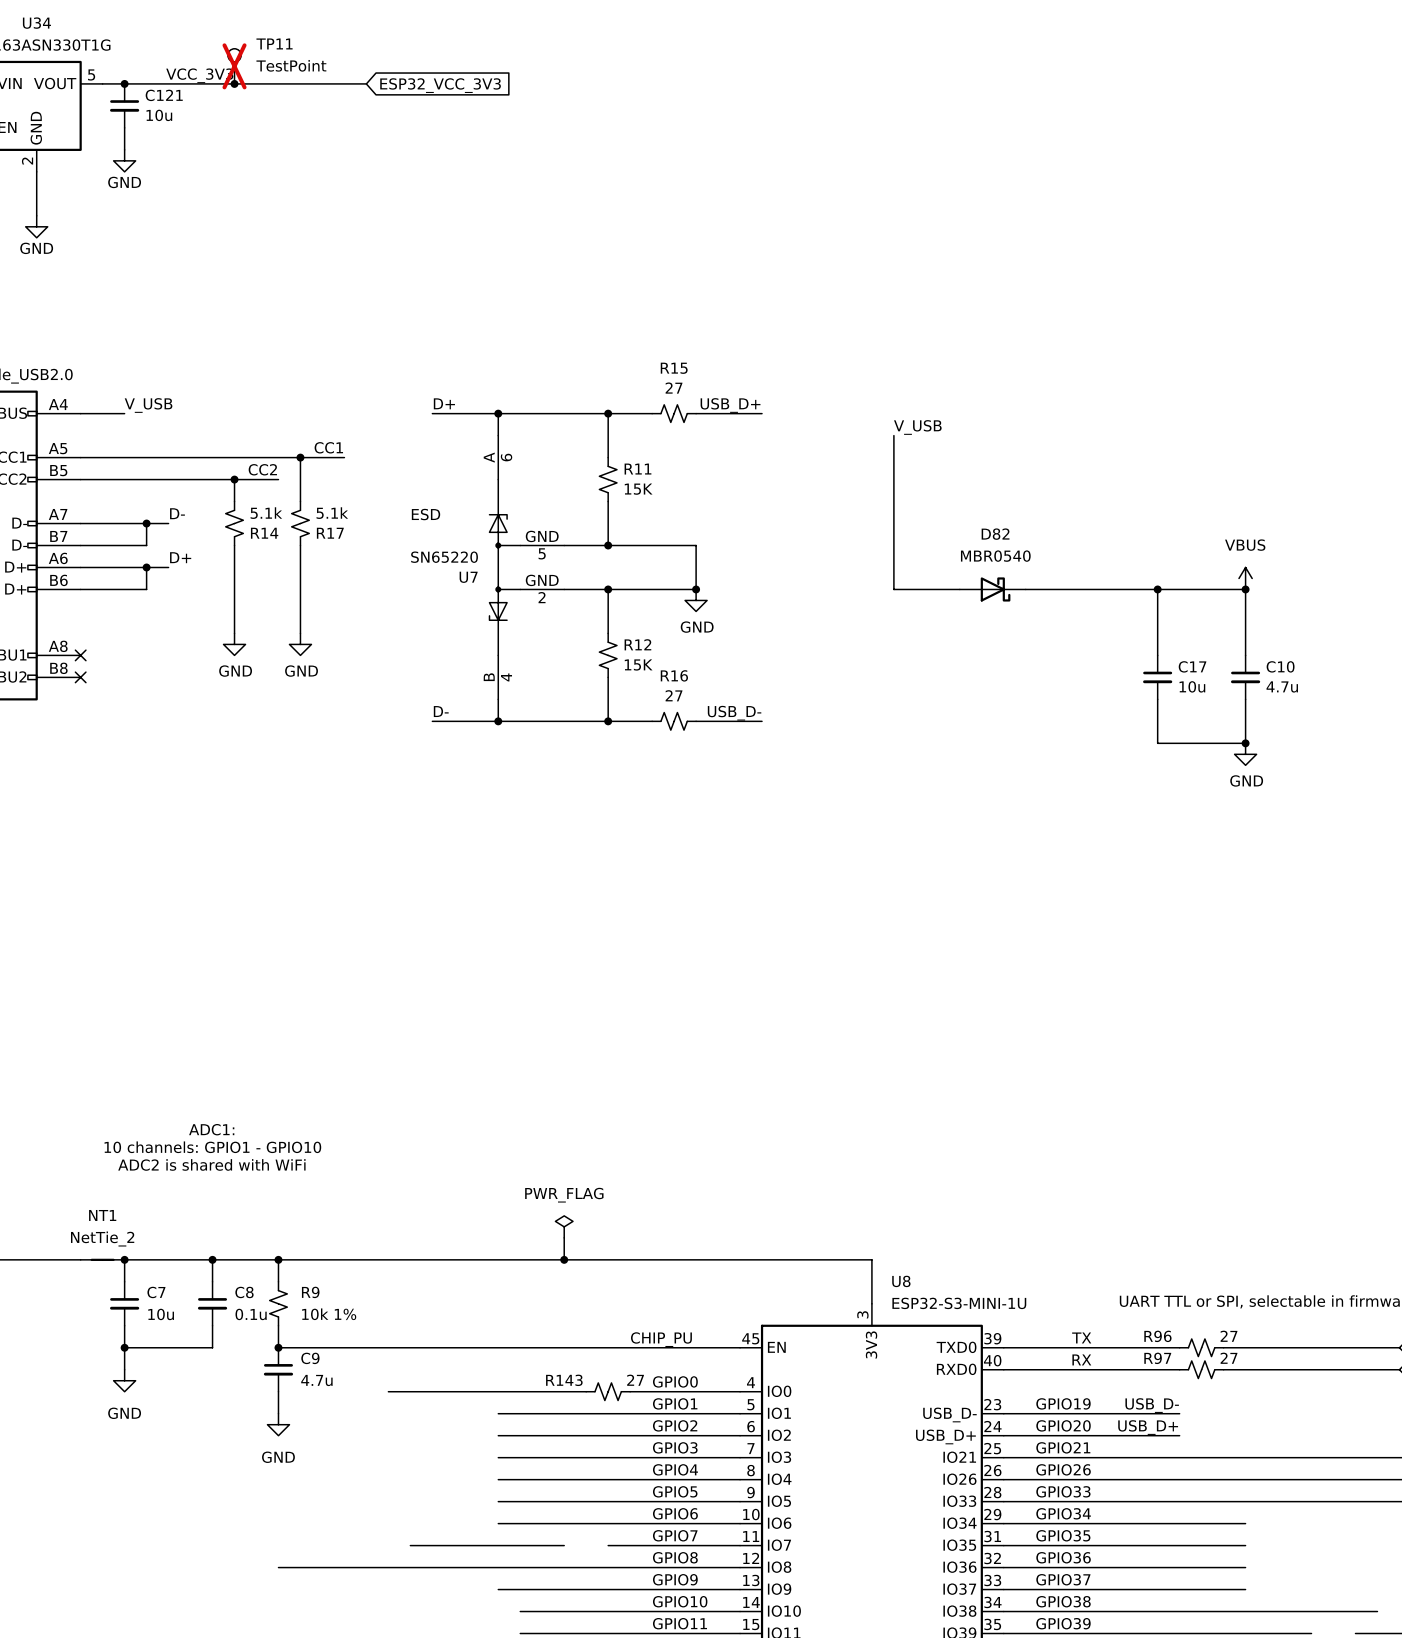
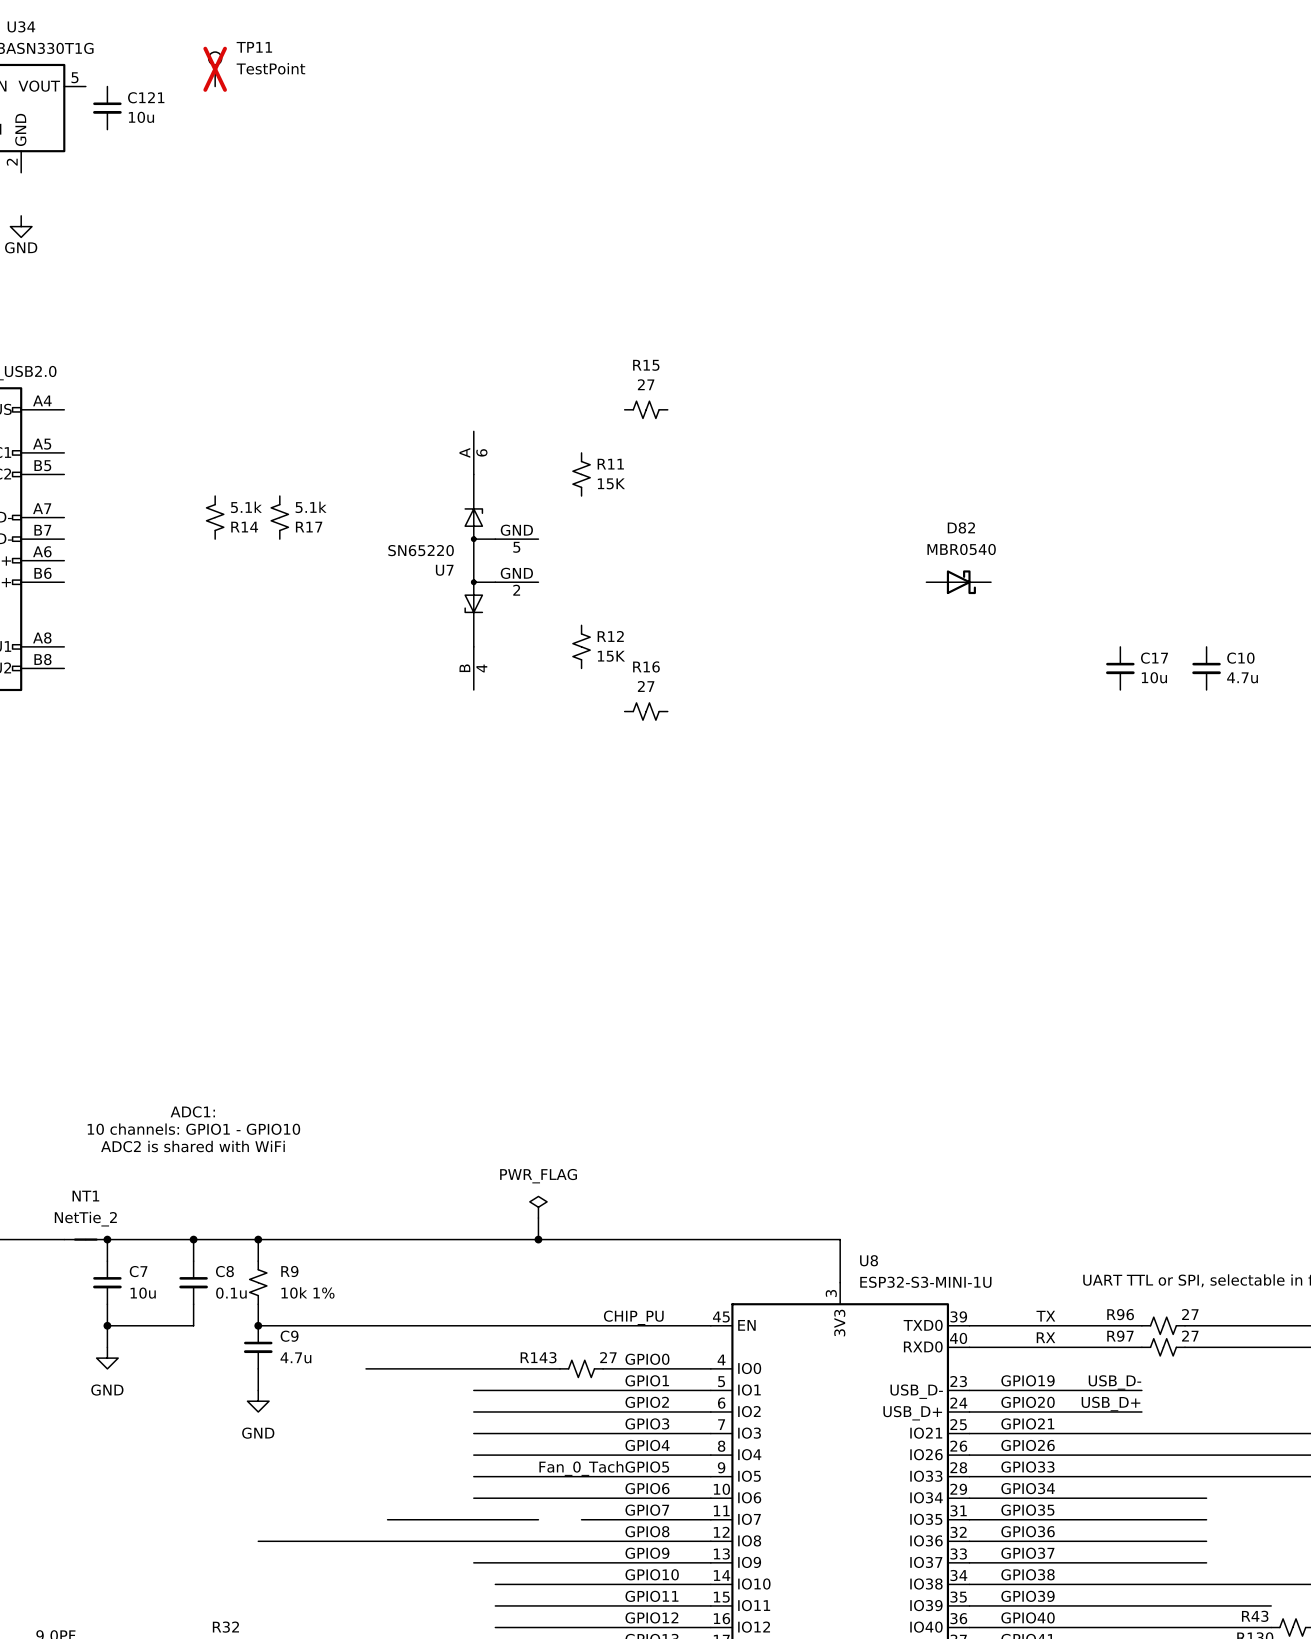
label: VCC_3V3 (199, 75) -> none
wire: (102, 83) (366, 83) -> none
junction: (124, 83) -> none
junction: (234, 83) -> none
global label: ESP32_VCC_3V3 (440, 85) -> none
wire: (124, 127) (124, 149) -> none
power symbol: GND (124, 160) -> none
wire: (36, 171) (36, 215) -> none
label: D+ (444, 403) -> none
label: V_USB (148, 405) -> none
label: USB_D+ (730, 405) -> none
wire: (80, 413) (124, 413) -> none
wire: (432, 413) (652, 413) -> none
wire: (498, 413) (498, 435) -> none
junction: (498, 413) -> none
wire: (608, 413) (608, 457) -> none
junction: (608, 413) -> none
wire: (696, 413) (762, 413) -> none
label: V_USB (917, 427) -> none
wire: (893, 435) (893, 589) (959, 589) -> none
label: CC1 (328, 447) -> none
wire: (80, 457) (344, 457) -> none
wire: (300, 457) (300, 501) -> none
junction: (300, 457) -> none
label: CC2 (262, 469) -> none
wire: (80, 479) (278, 479) -> none
wire: (234, 479) (234, 501) -> none
junction: (234, 479) -> none
wire: (608, 501) (608, 545) -> none
label: D- (177, 513) -> none
text: ESD (426, 514) -> none
wire: (80, 523) (168, 523) -> none
wire: (146, 523) (146, 545) (80, 545) -> none
junction: (146, 523) -> none
wire: (234, 545) (234, 633) -> none
wire: (300, 545) (300, 633) -> none
wire: (564, 545) (696, 545) (696, 589) (564, 589) -> none
junction: (608, 545) -> none
label: D+ (180, 557) -> none
wire: (80, 567) (168, 567) -> none
wire: (146, 567) (146, 589) (80, 589) -> none
junction: (146, 567) -> none
power symbol: VBUS (1245, 578) -> none
wire: (608, 589) (608, 633) -> none
junction: (608, 589) -> none
junction: (696, 589) -> none
wire: (1025, 589) (1245, 589) (1245, 655) -> none
wire: (1157, 589) (1157, 655) -> none
junction: (1157, 589) -> none
junction: (1245, 589) -> none
power symbol: GND (696, 600) -> none
power symbol: GND (234, 644) -> none
power symbol: GND (300, 644) -> none
no-connect mark: (80, 655) -> none
no-connect mark: (80, 677) -> none
wire: (608, 677) (608, 721) -> none
wire: (498, 699) (498, 721) -> none
wire: (1157, 699) (1157, 743) (1245, 743) (1245, 699) -> none
label: D- (441, 711) -> none
label: USB_D- (734, 713) -> none
wire: (432, 721) (652, 721) -> none
junction: (498, 721) -> none
junction: (608, 721) -> none
wire: (696, 721) (762, 721) -> none
junction: (1245, 743) -> none
power symbol: GND (1245, 754) -> none
label: none -> Fan_0_Tach (581, 1468)

